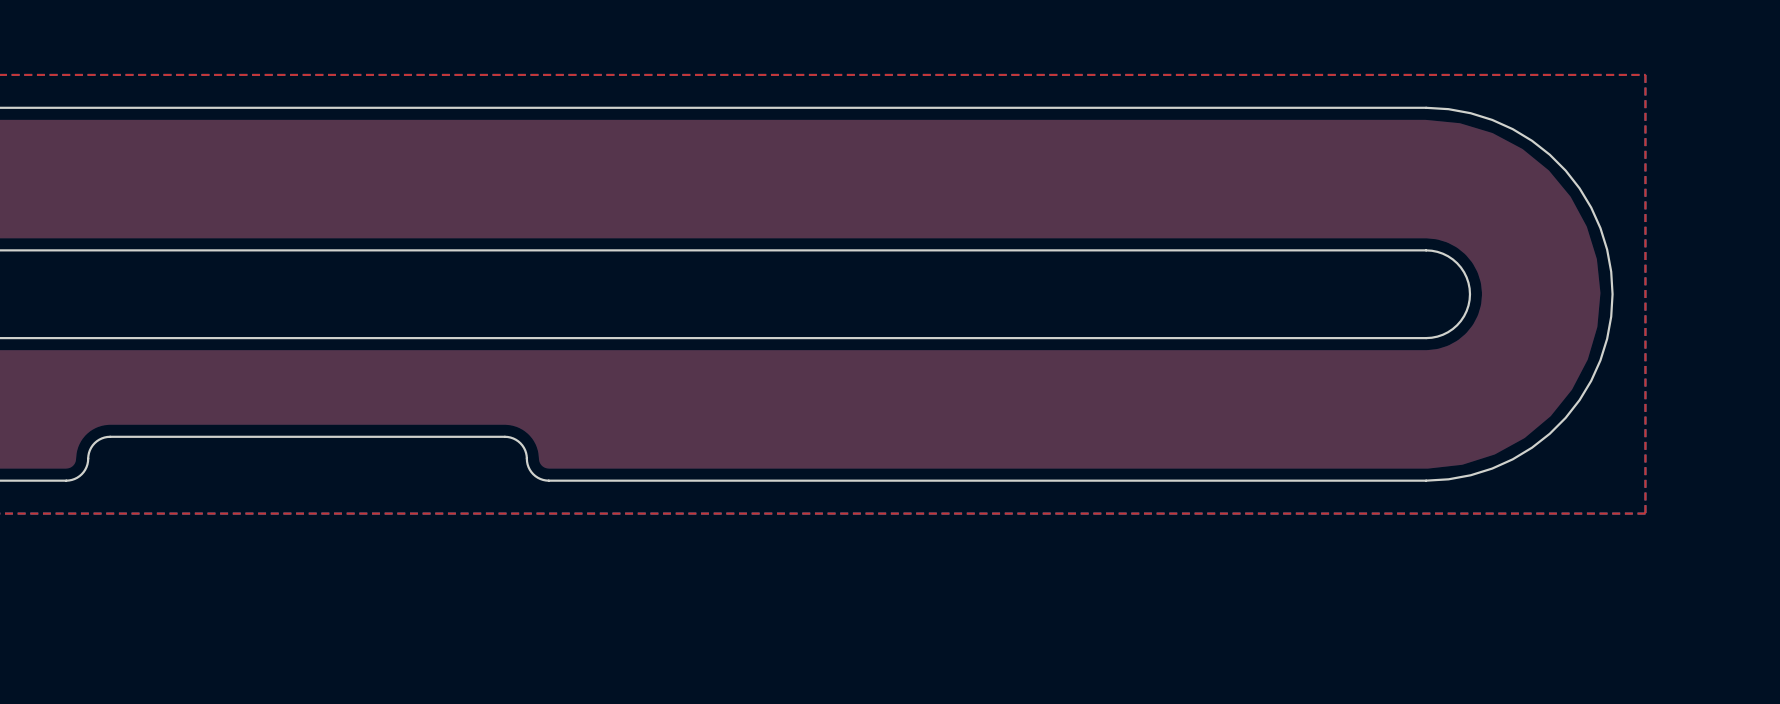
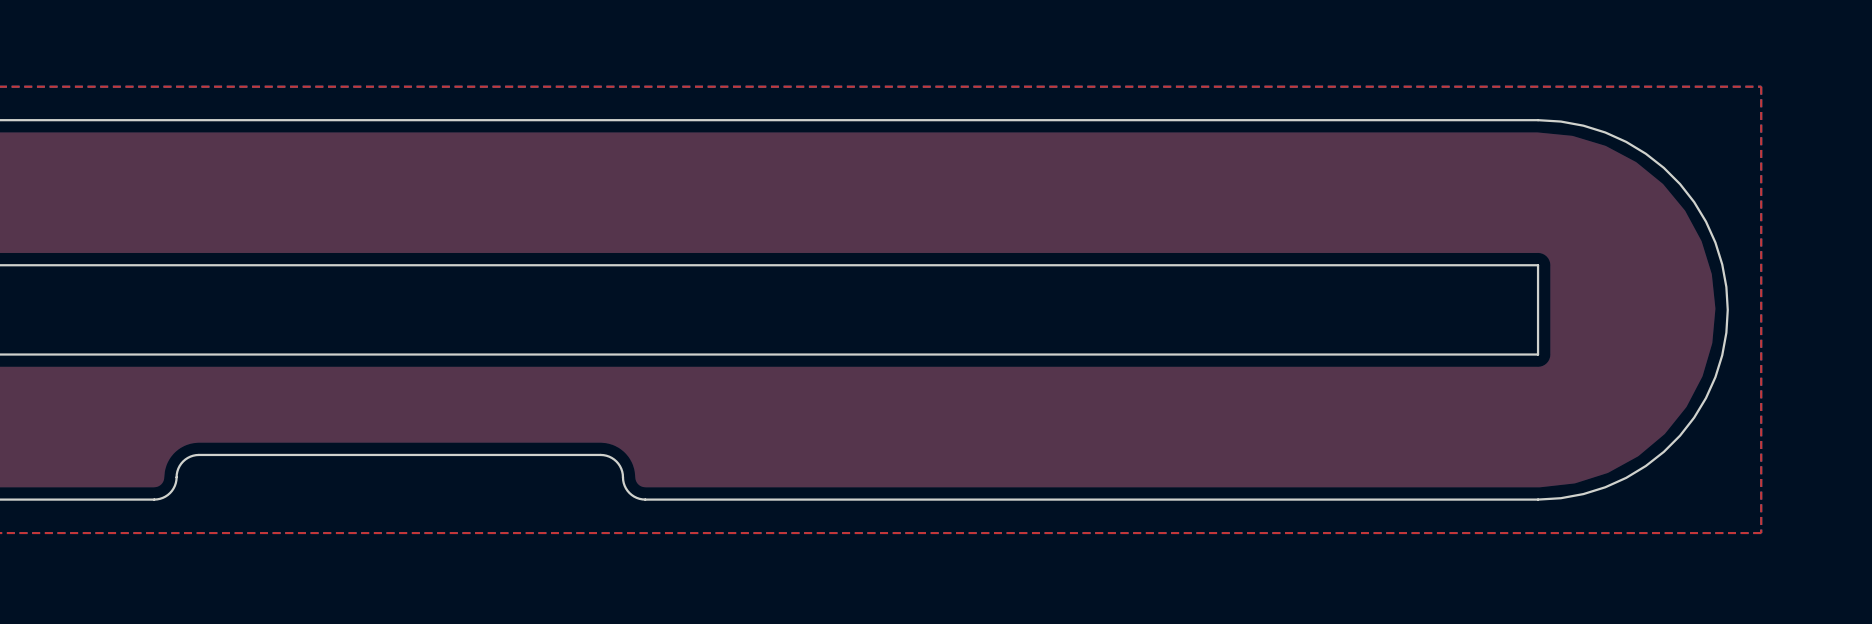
board edge: (1426, 250) (1442, 253) (1457, 263) (1466, 277) (1469, 294) (1466, 311) (1457, 325) (1442, 334) (1426, 338) -> (1538, 265) (1538, 354)

